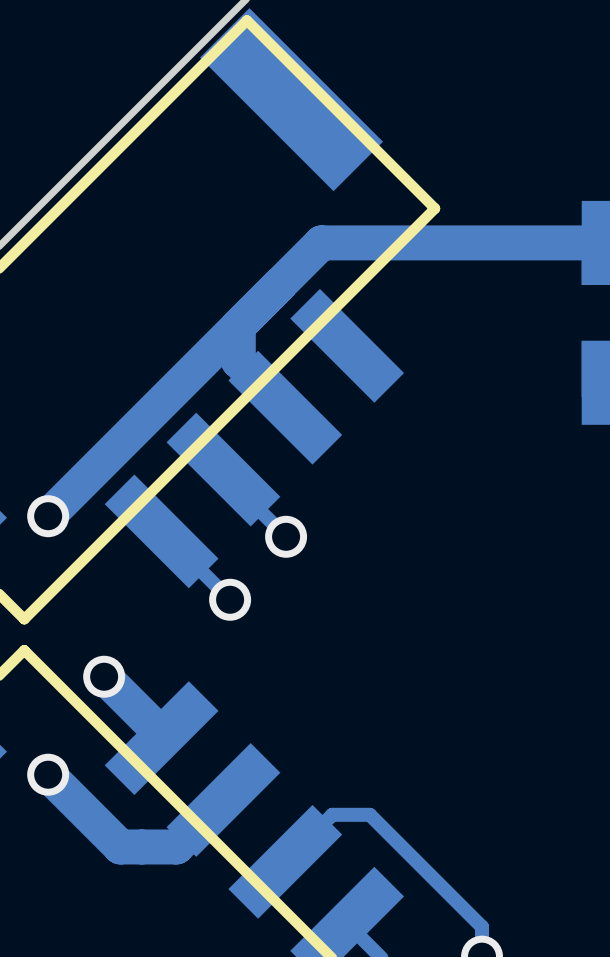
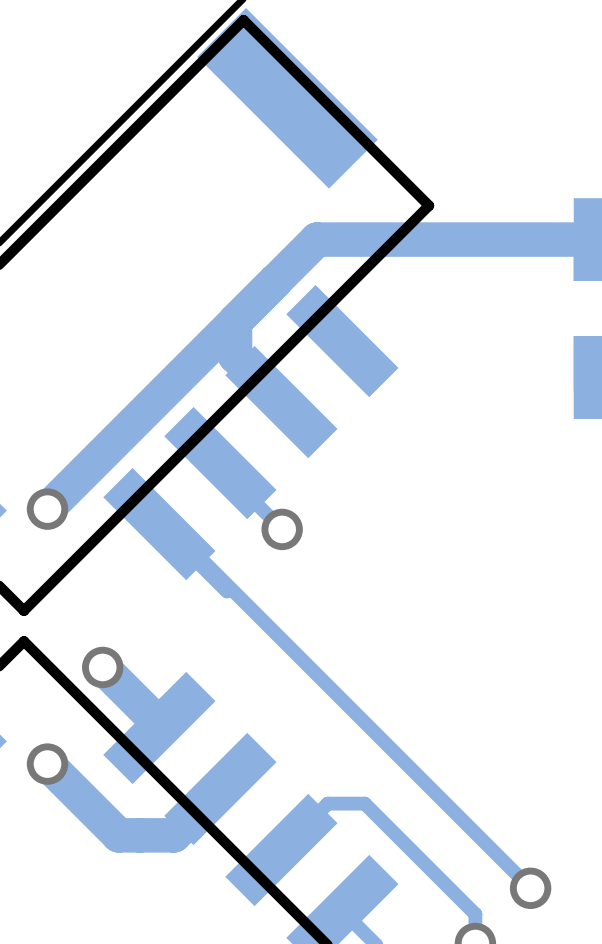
track: none -> (166, 524) (530, 888)
via: (230, 599) -> none
via: none -> (530, 888)

